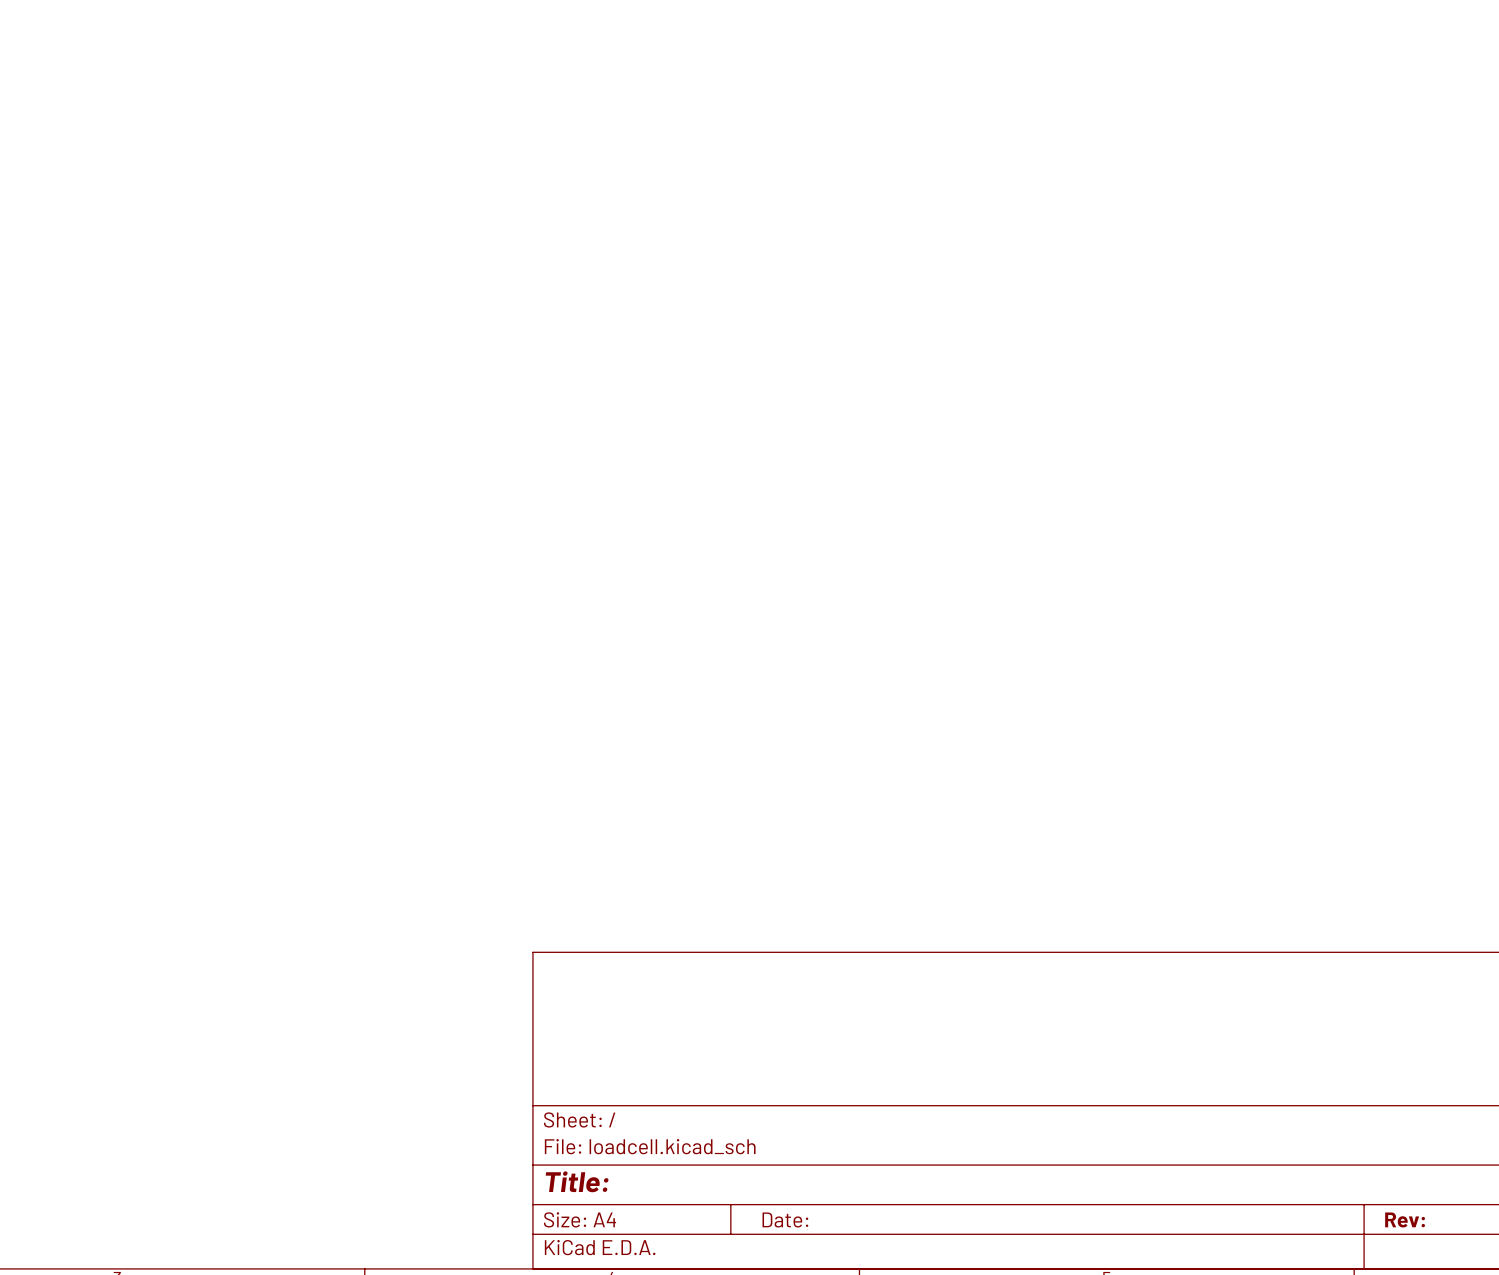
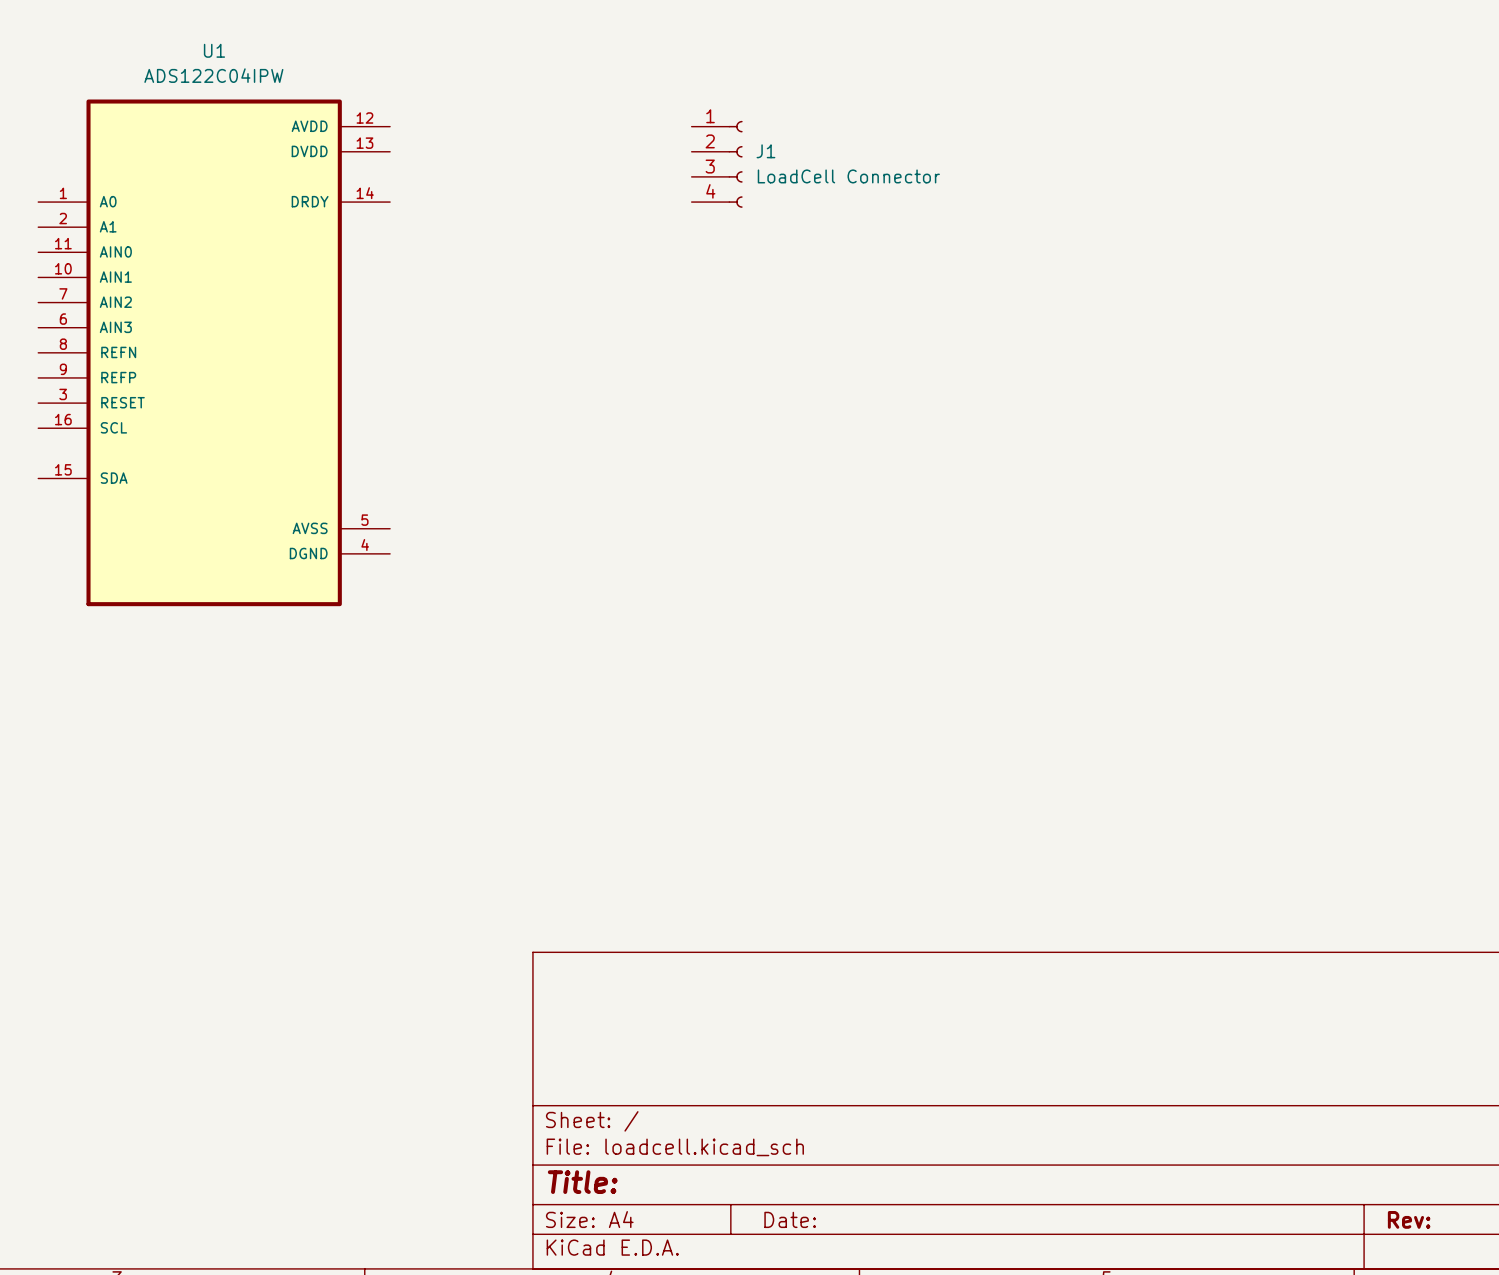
J1: none -> LoadCell Connector (717, 164)
U1: none -> ADS122C04IPW (214, 352)

